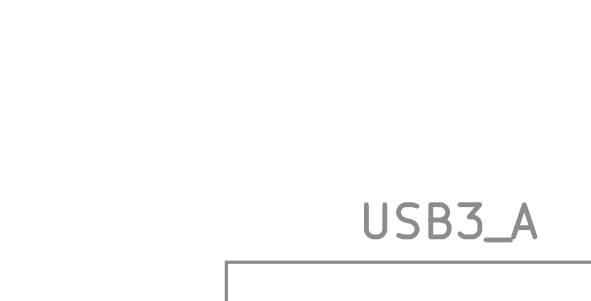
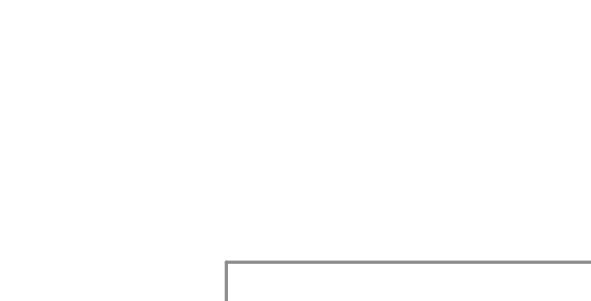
part value: USB3_A (450, 222) -> none

